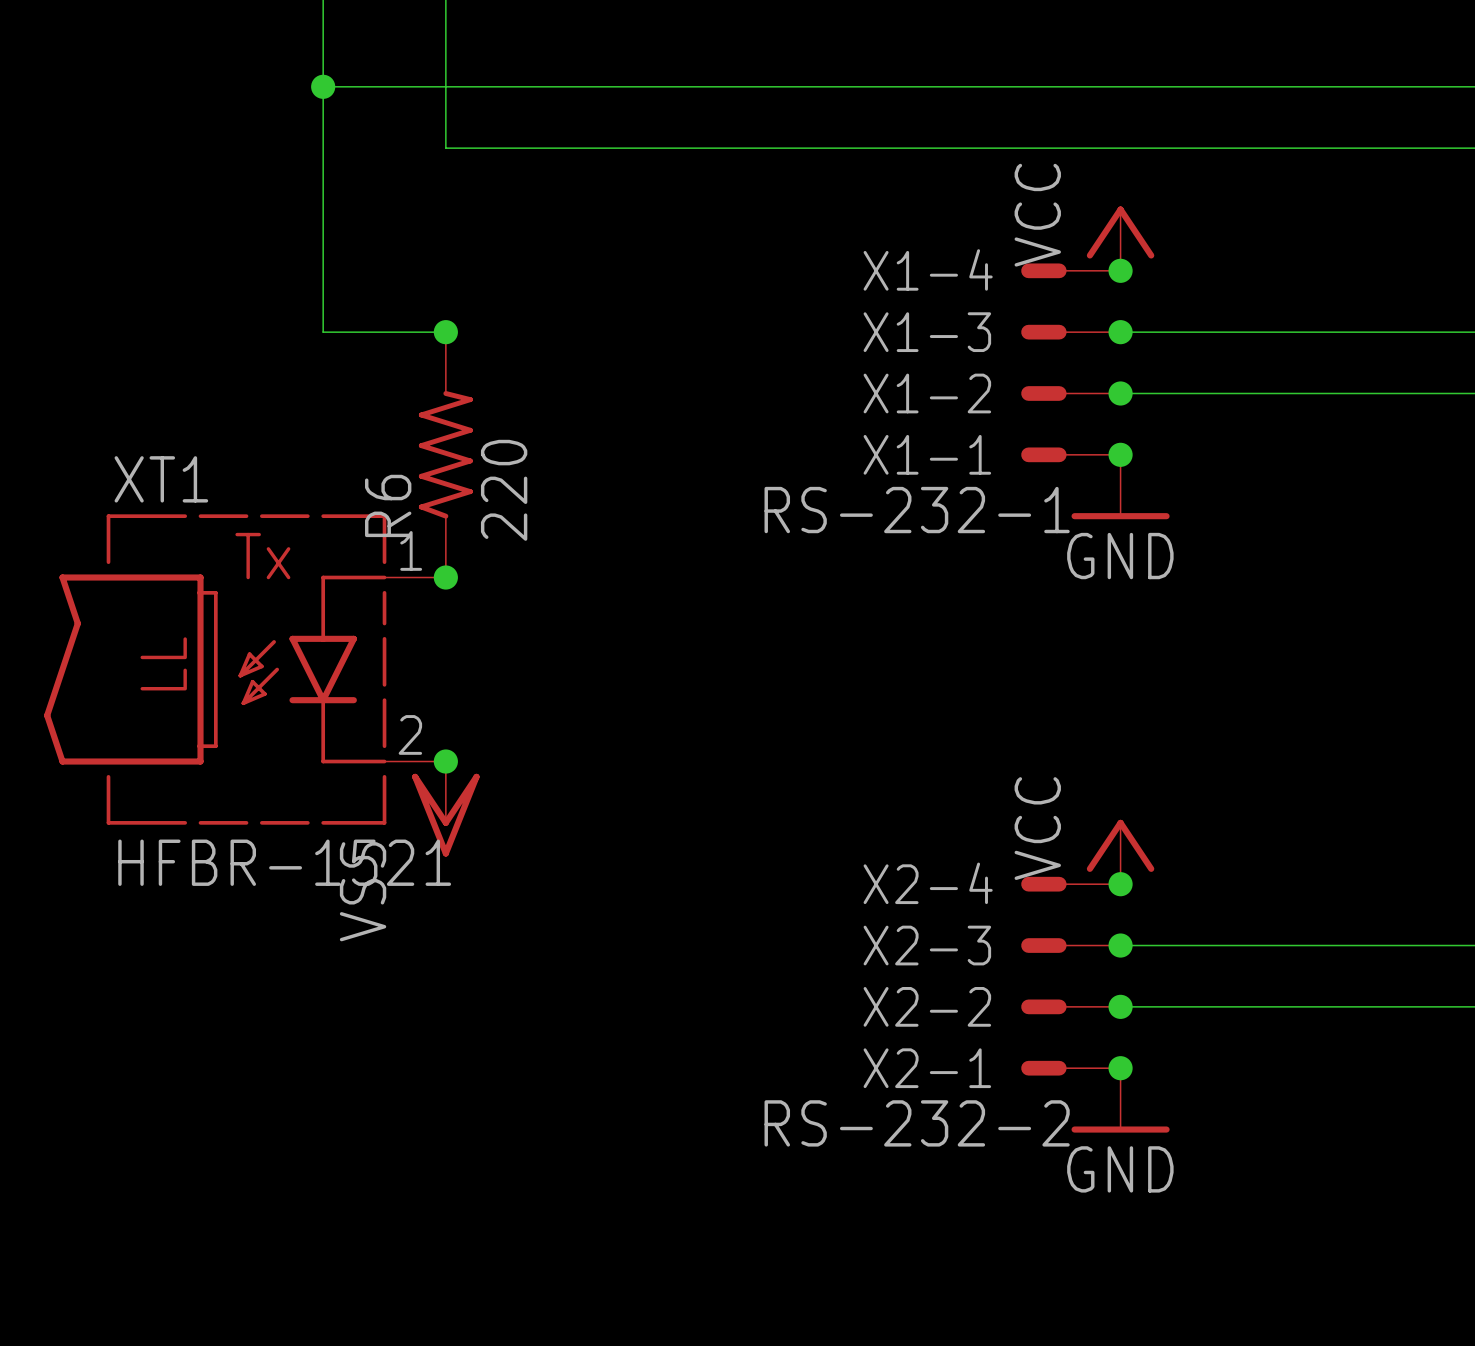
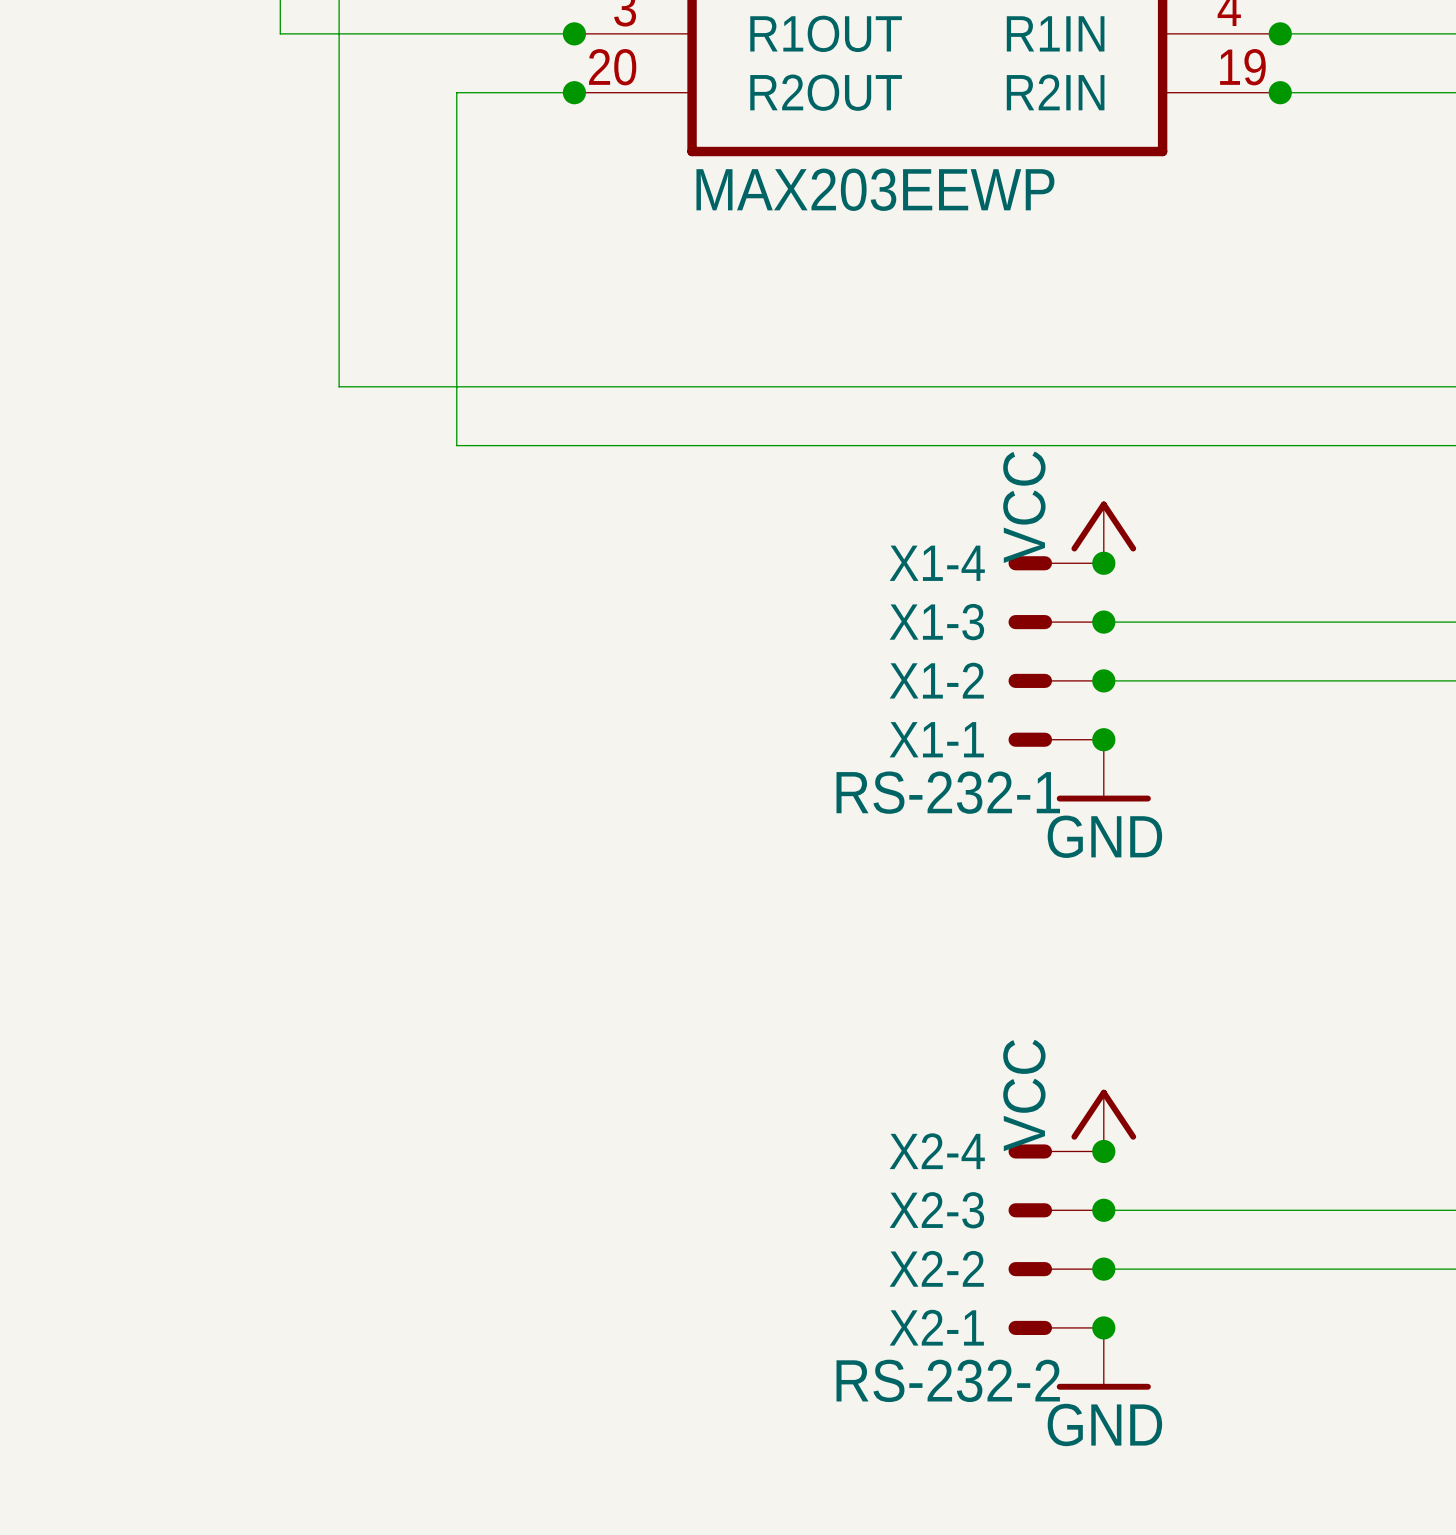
wire: (323, 86) (323, 332) (445, 332) -> none
junction: (323, 86) -> none
junction: (445, 332) -> none
R6: 220 (445, 454) -> none
junction: (445, 577) -> none
XT1: HFBR-1521 (244, 669) -> none
junction: (445, 761) -> none
power symbol: VSS (445, 809) -> none

